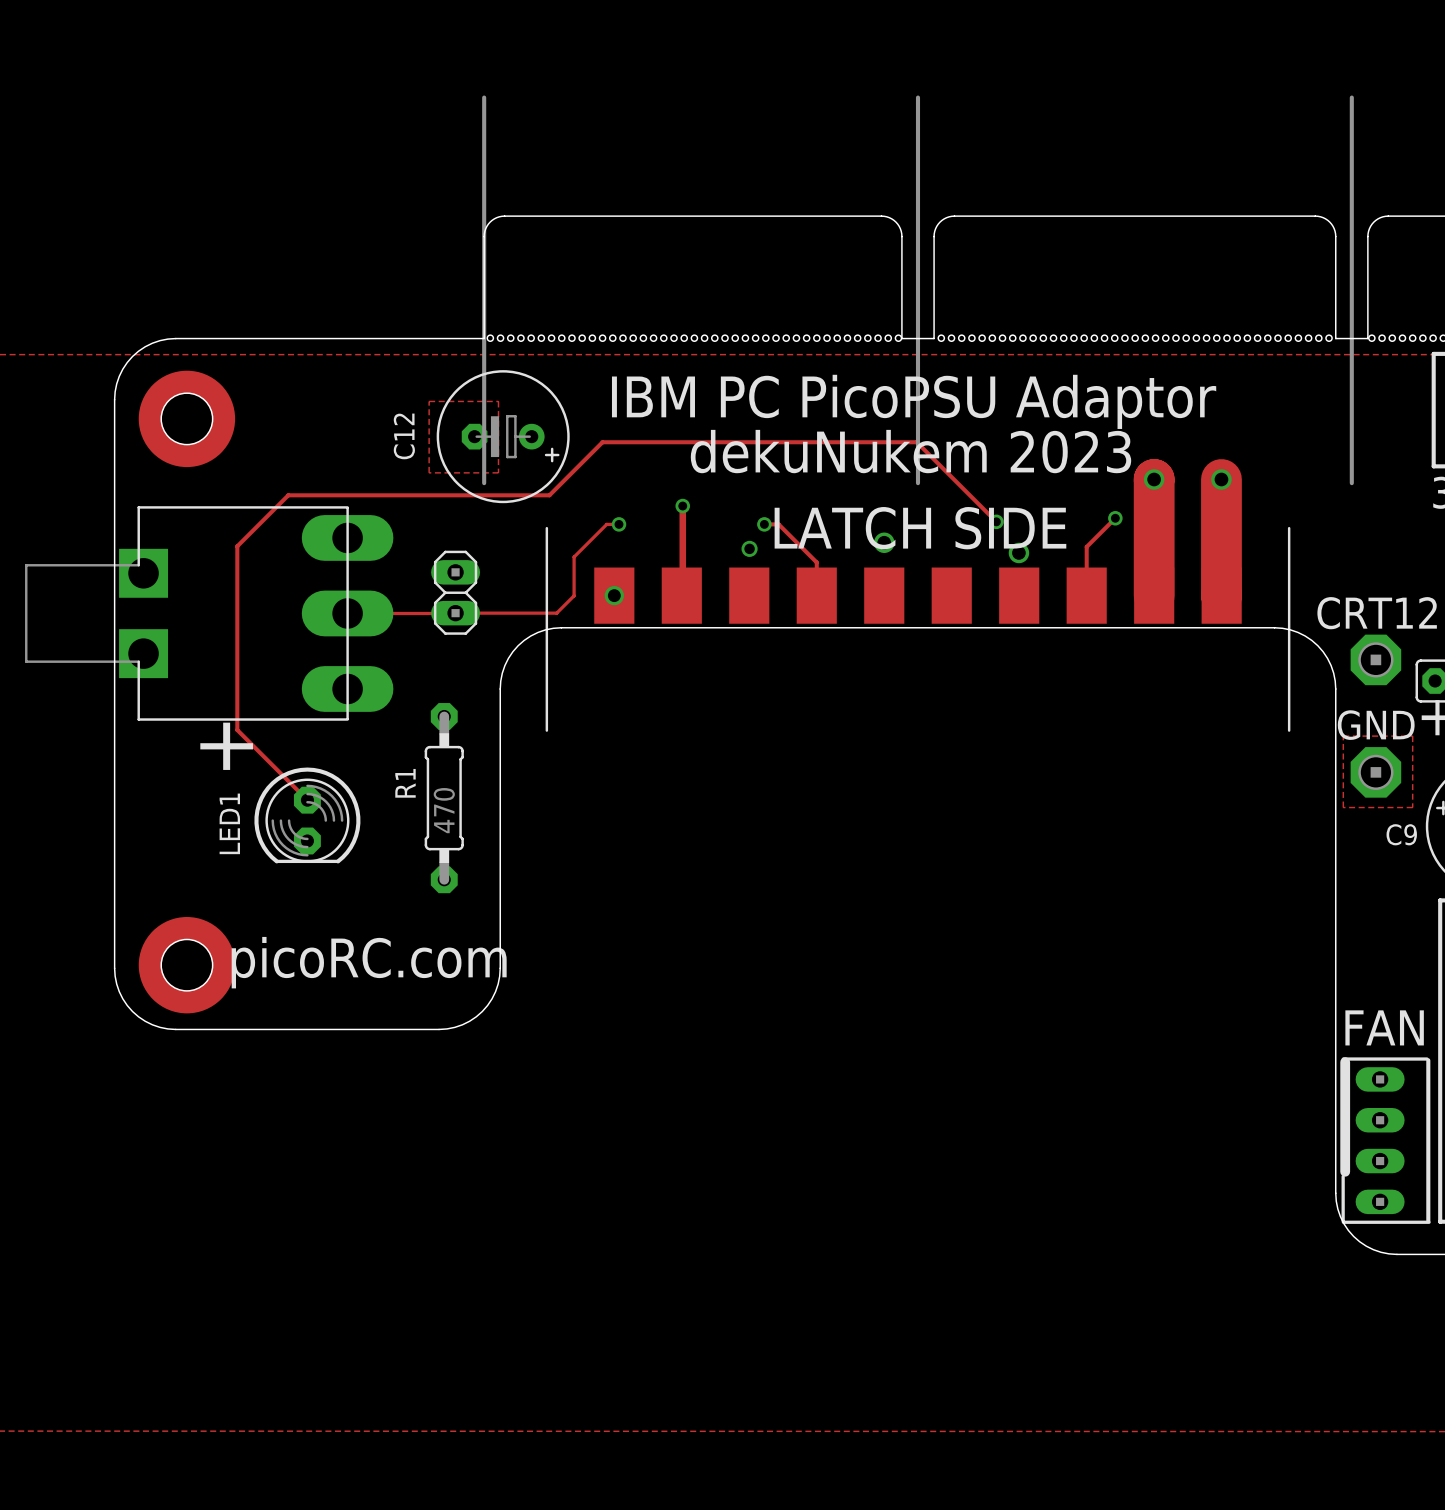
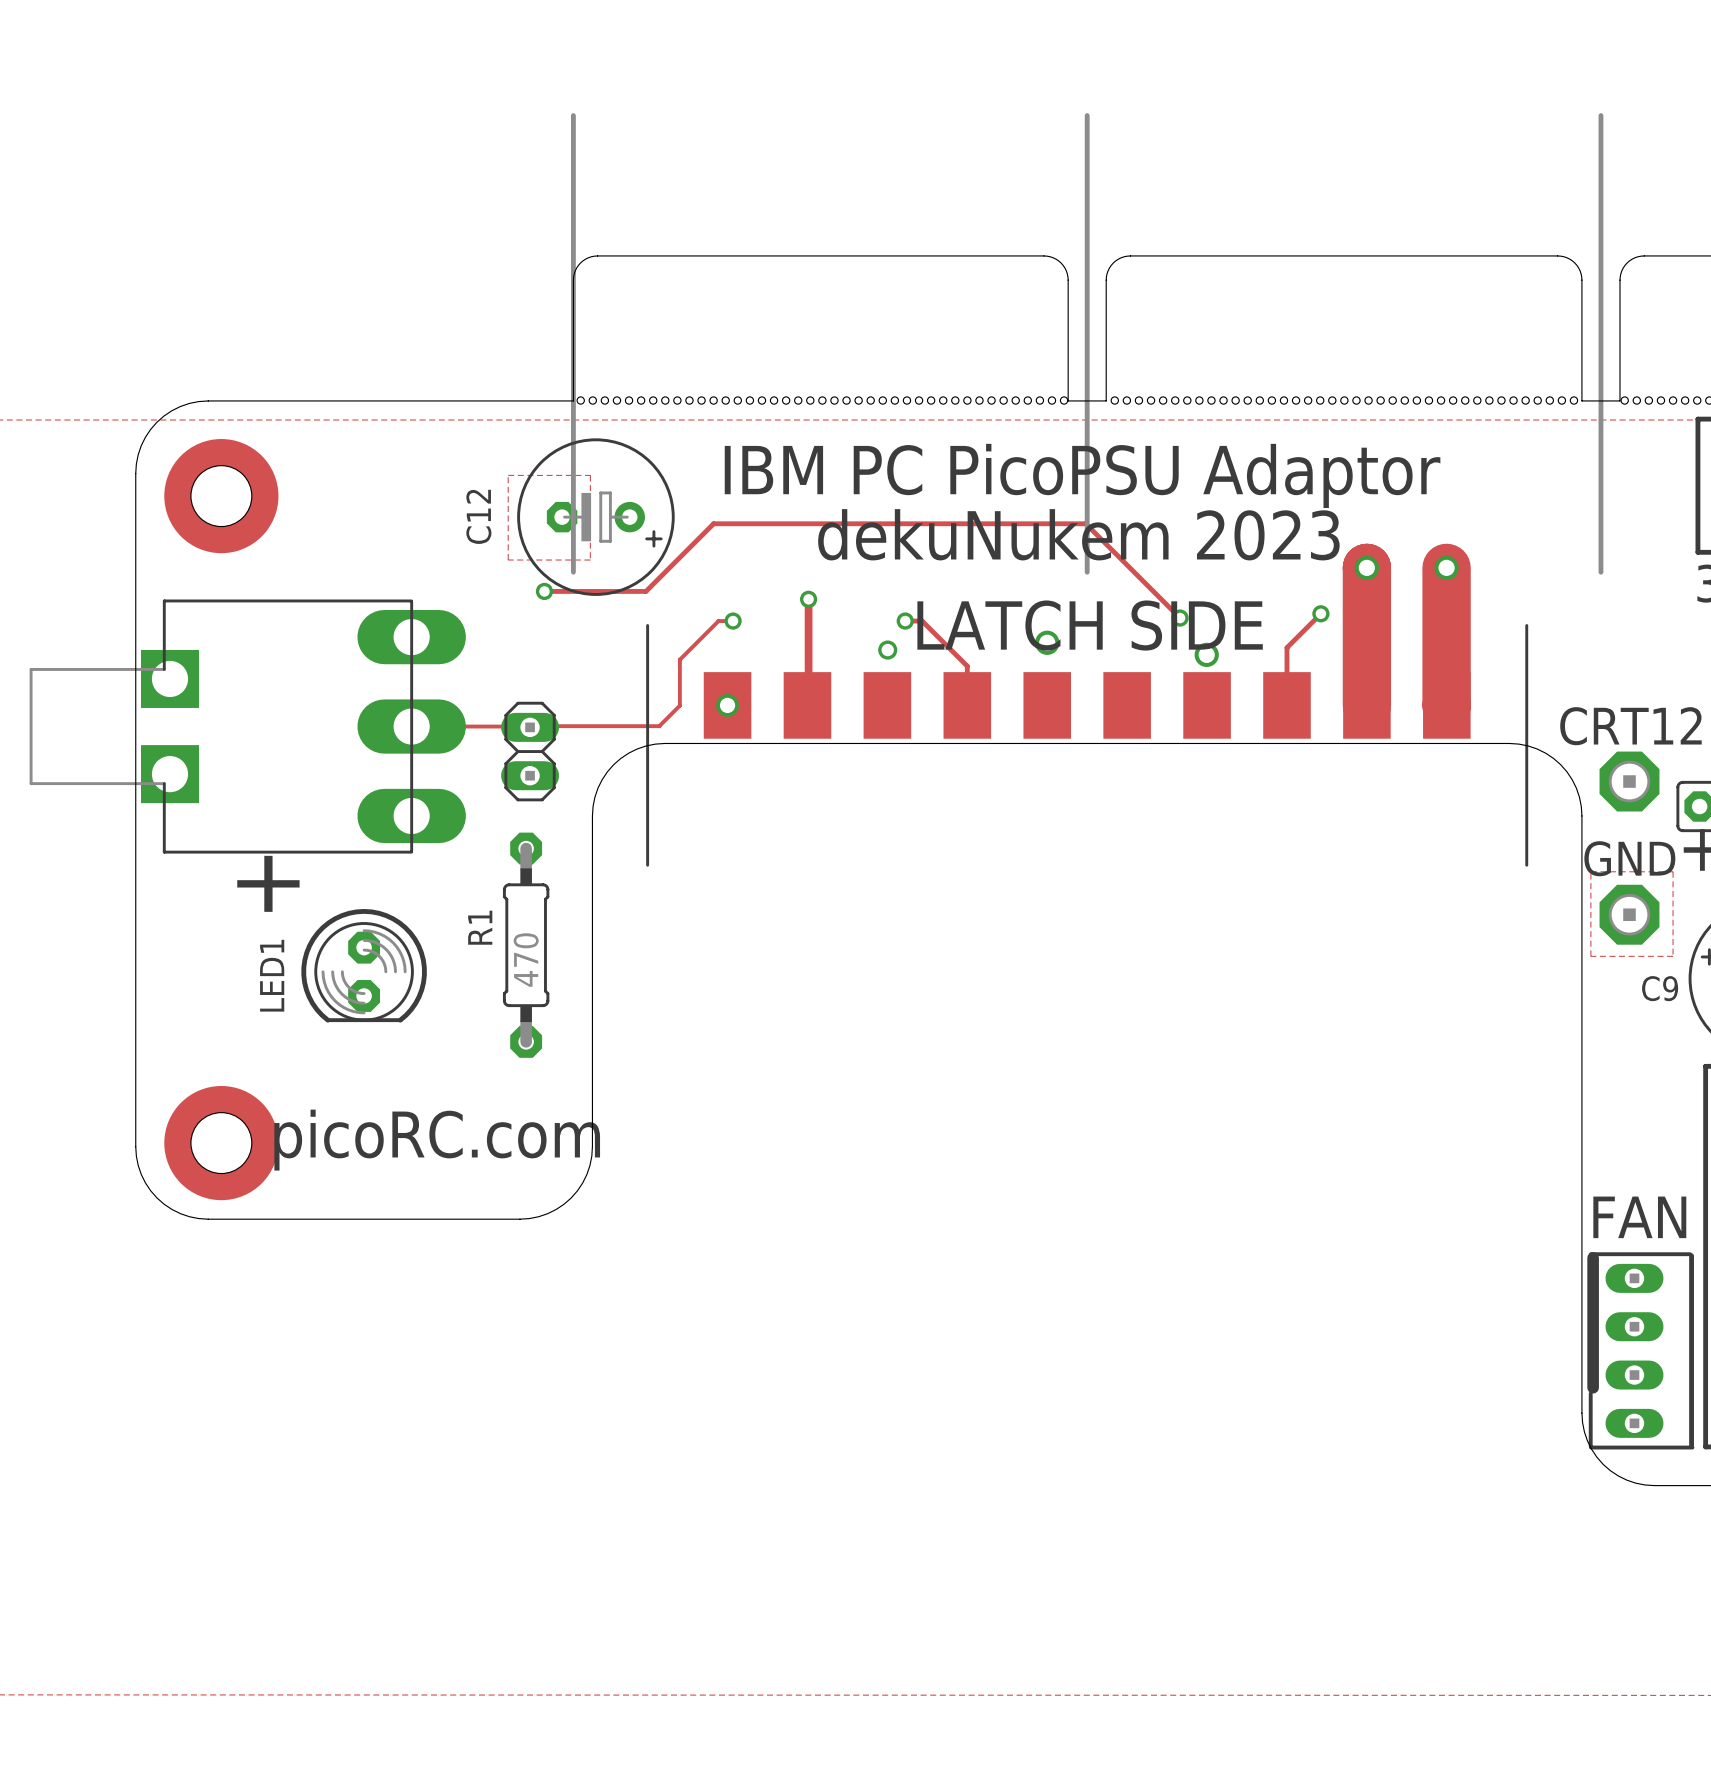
track: (549, 495) (288, 495) (237, 546) (237, 730) (307, 800) -> (650, 586) (645, 591) (544, 591)
via: none -> (544, 591)
part position: (455, 592) -> (530, 751)

